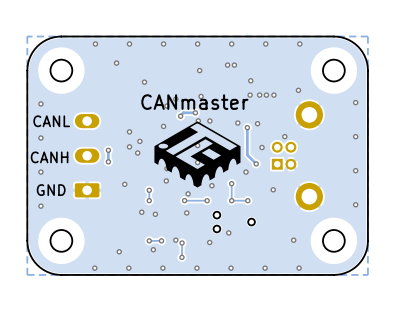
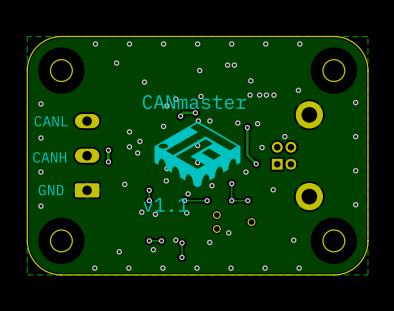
text: none -> v1.1 (165, 205)

